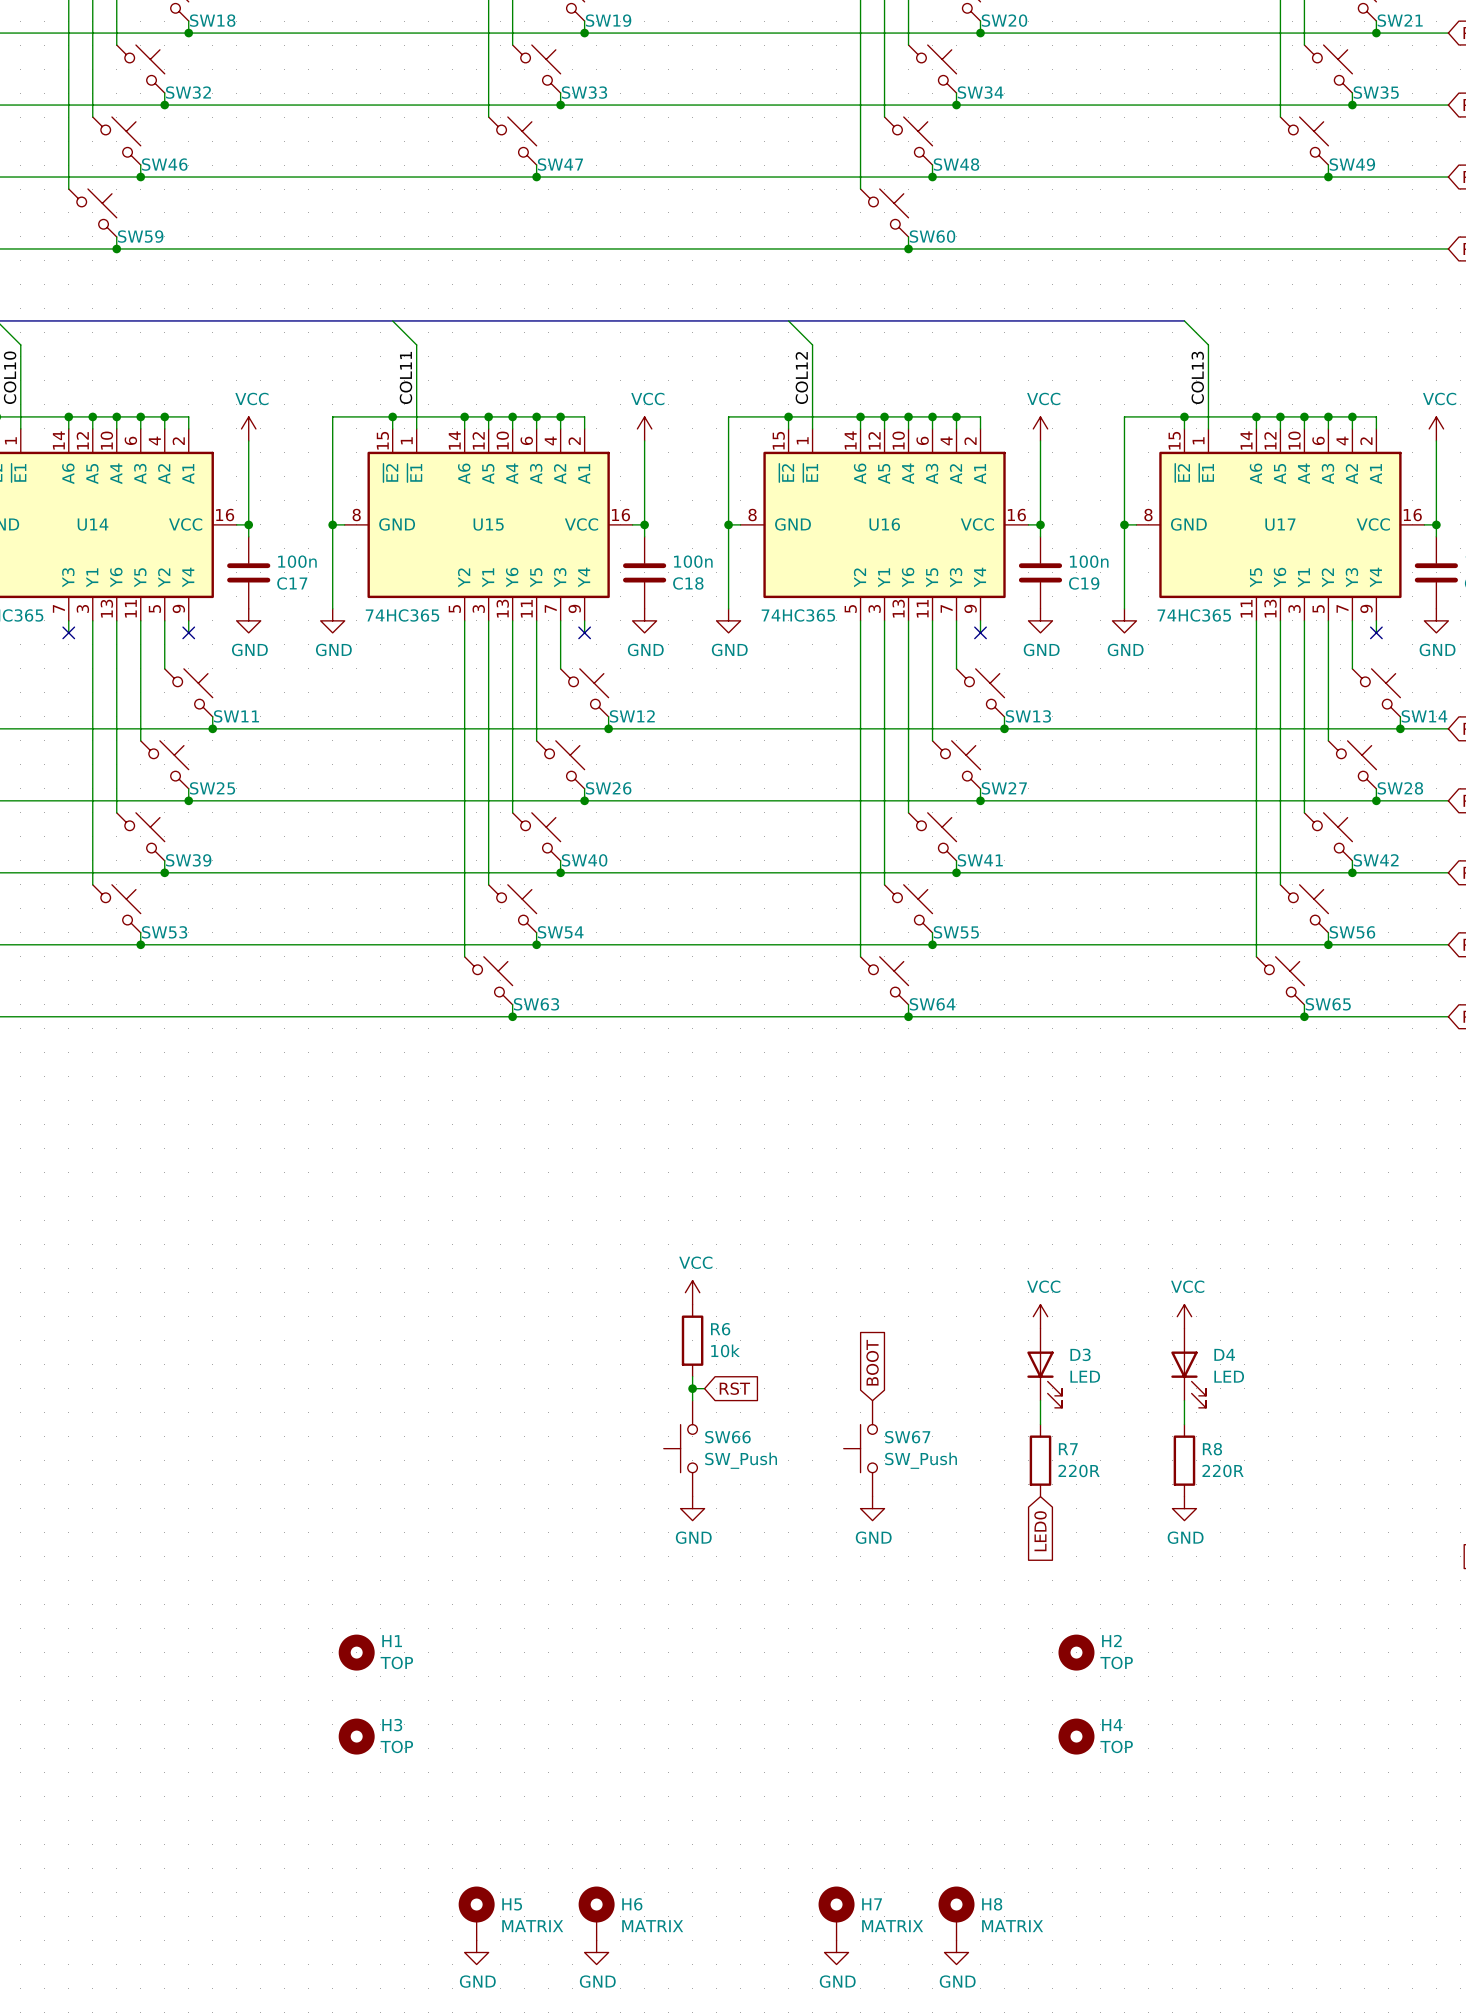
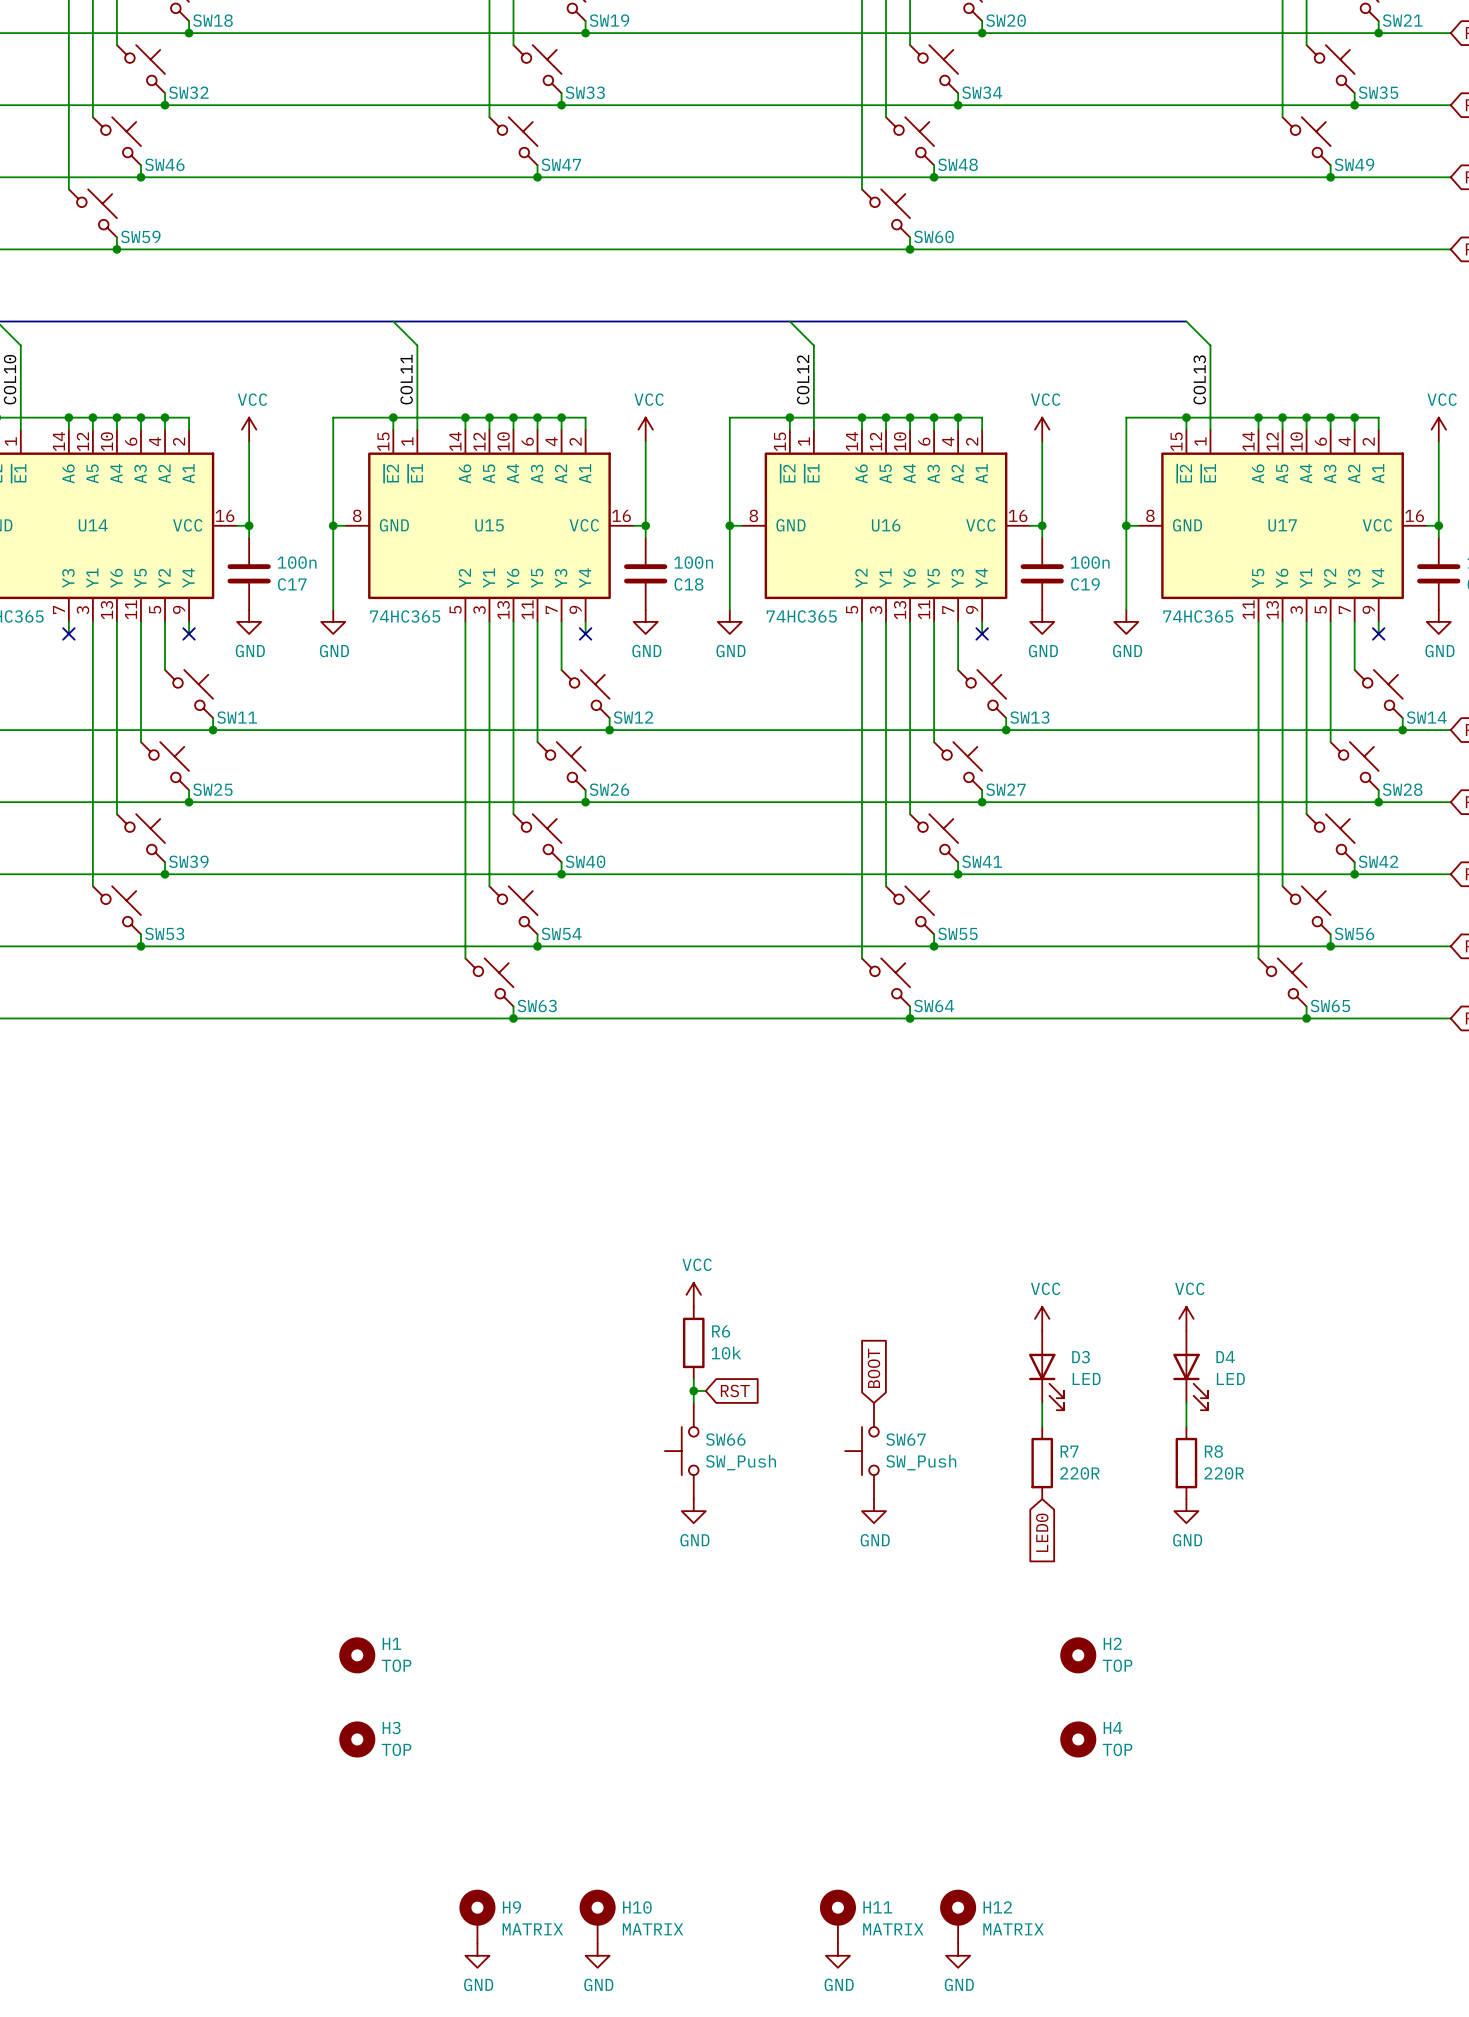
H5 name: H5 (512, 1904) -> H9 (511, 1907)
H6 name: H6 (632, 1904) -> H10 (637, 1907)
H7 name: H7 (872, 1904) -> H11 (877, 1907)
H8 name: H8 (992, 1904) -> H12 (997, 1907)

